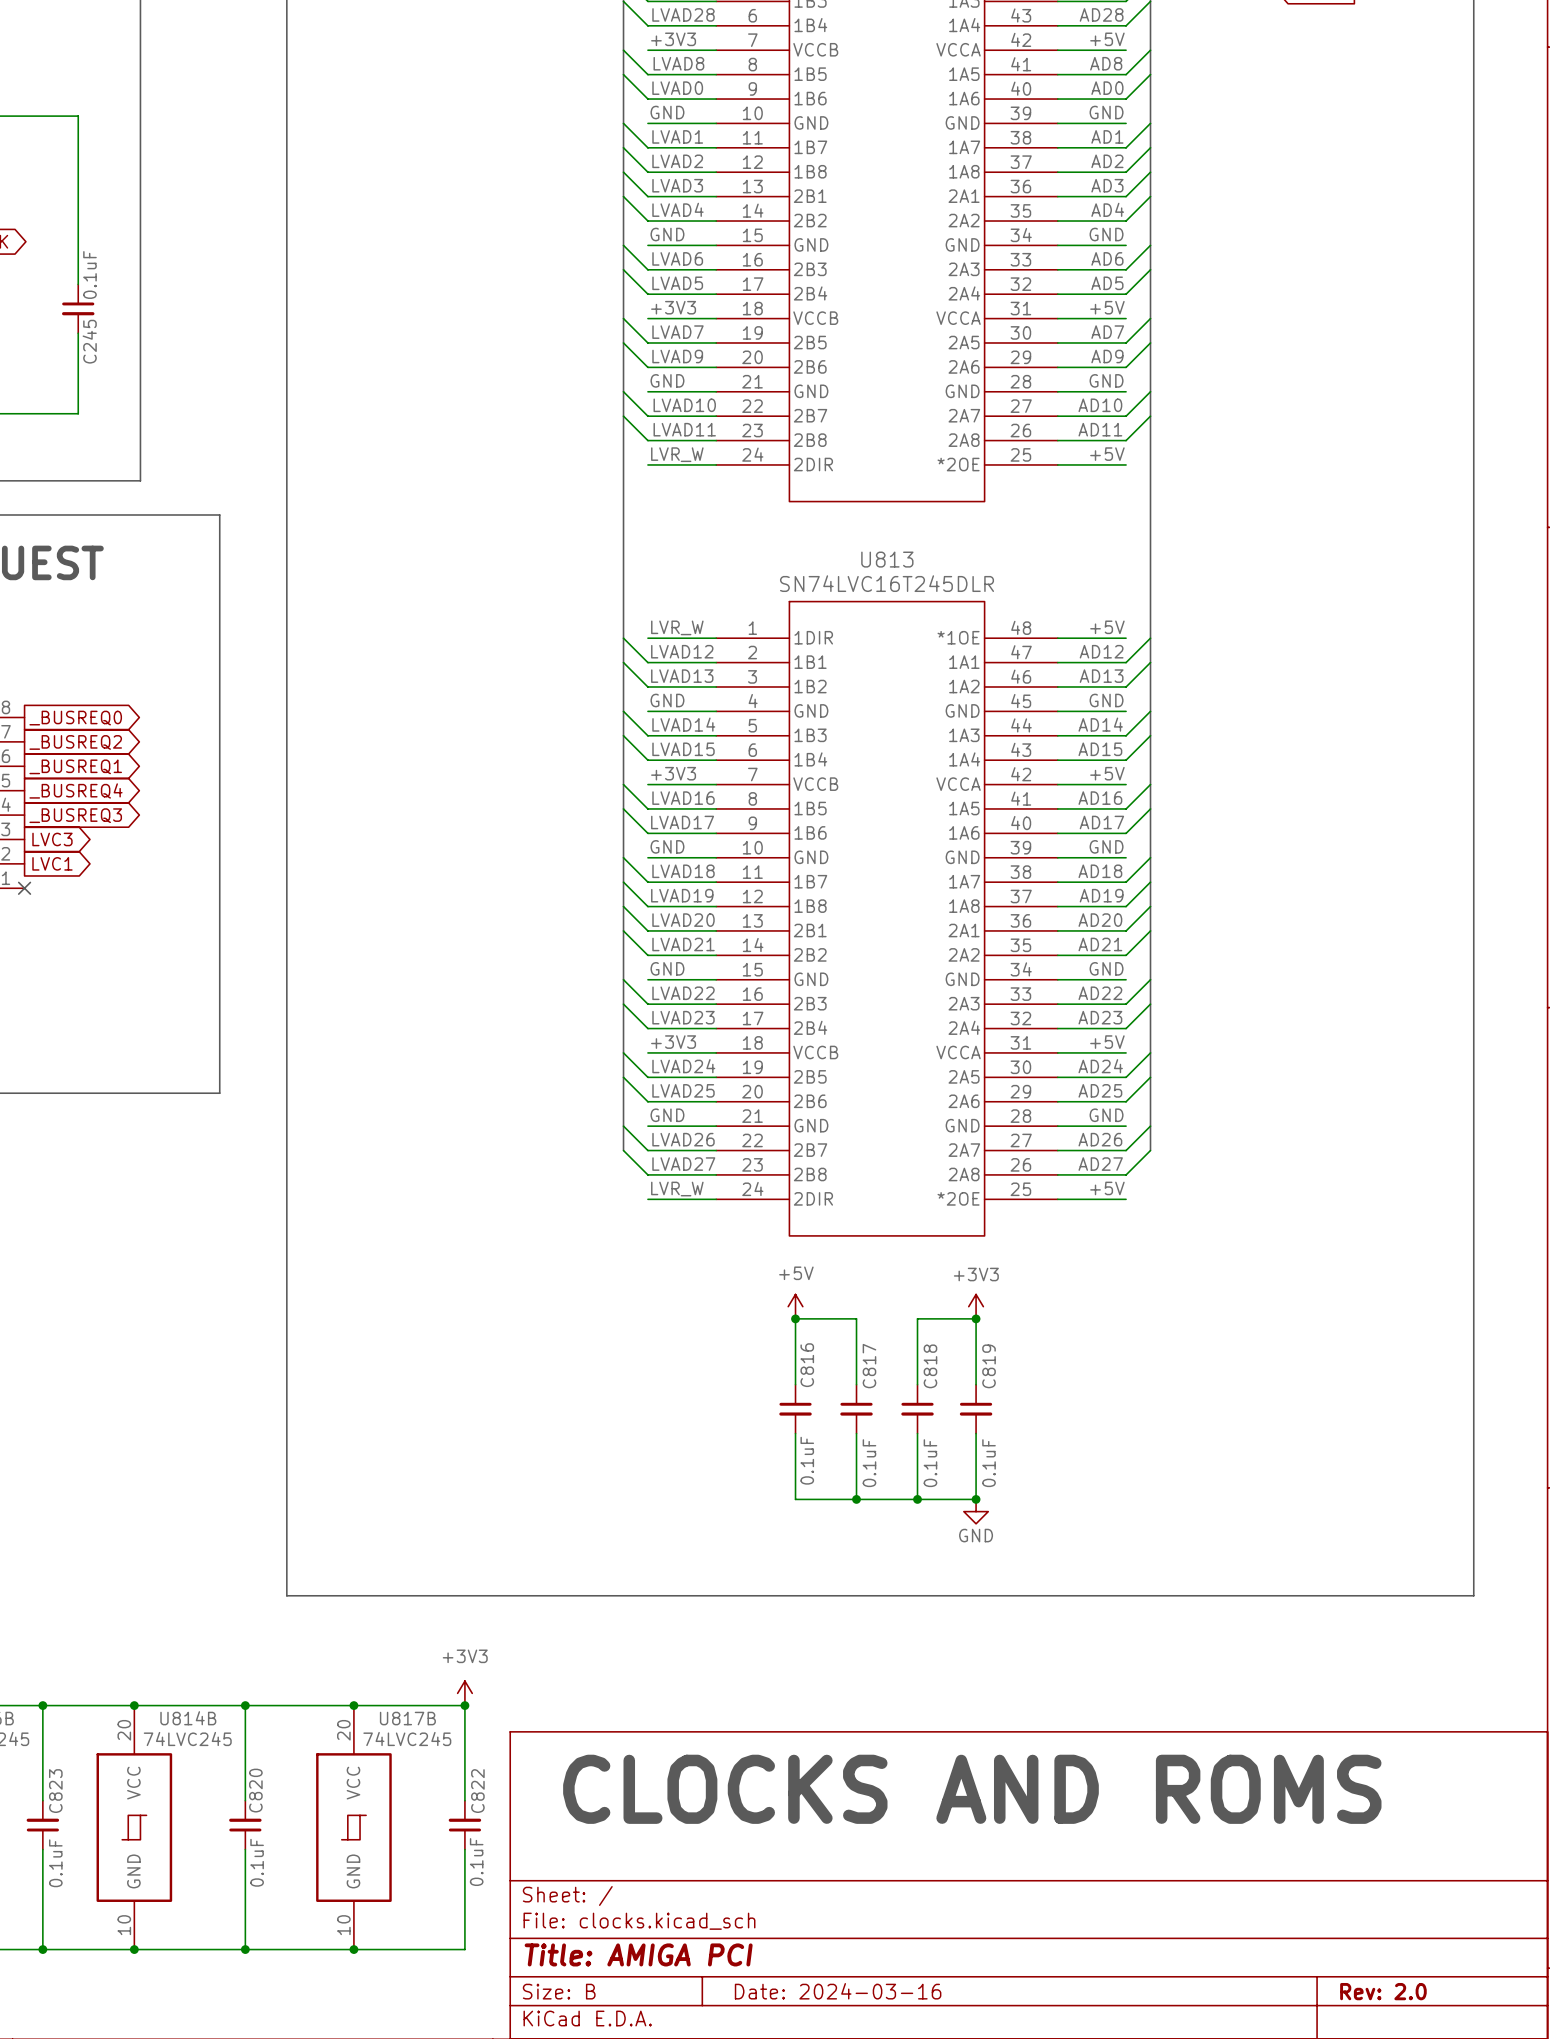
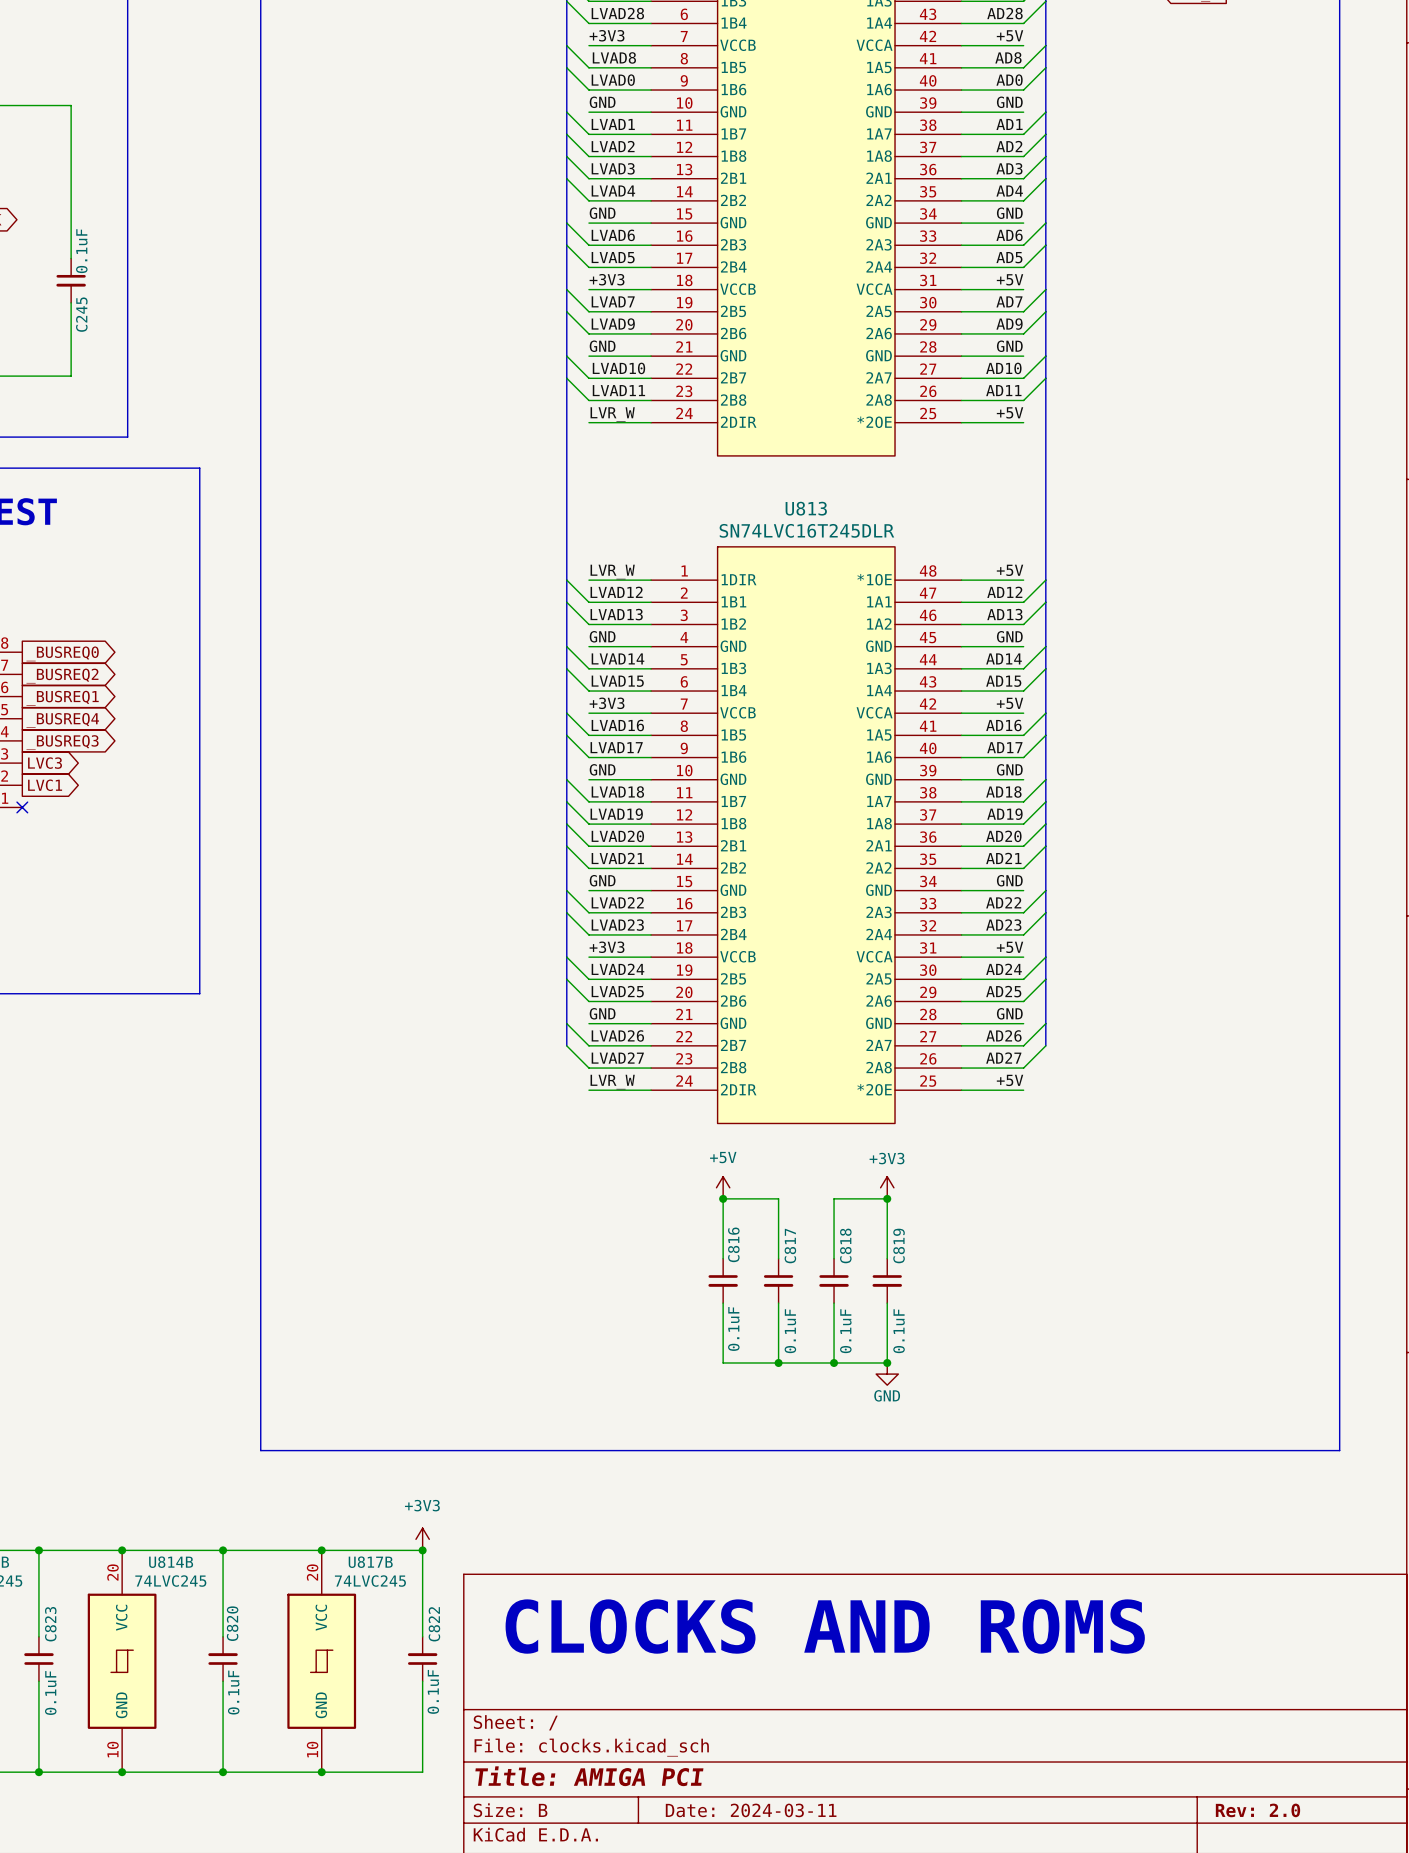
title block: Date: 2024-03-16 (838, 1991) -> Date: 2024-03-11 (751, 1810)

